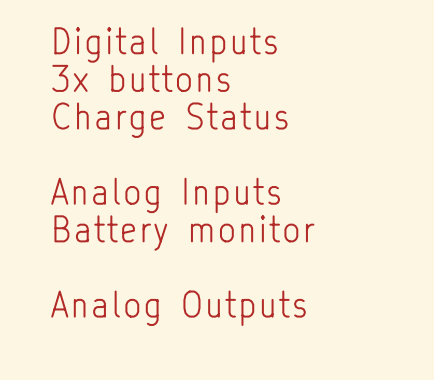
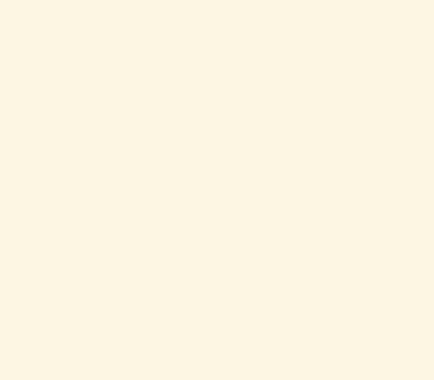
text: Digital Inputs (165, 44) -> none
text: 3x buttons (140, 78) -> none
text: Charge Status (170, 120) -> none
text: Analog Inputs (165, 195) -> none
text: Battery monitor (184, 233) -> none
text: Analog Outputs (178, 308) -> none

